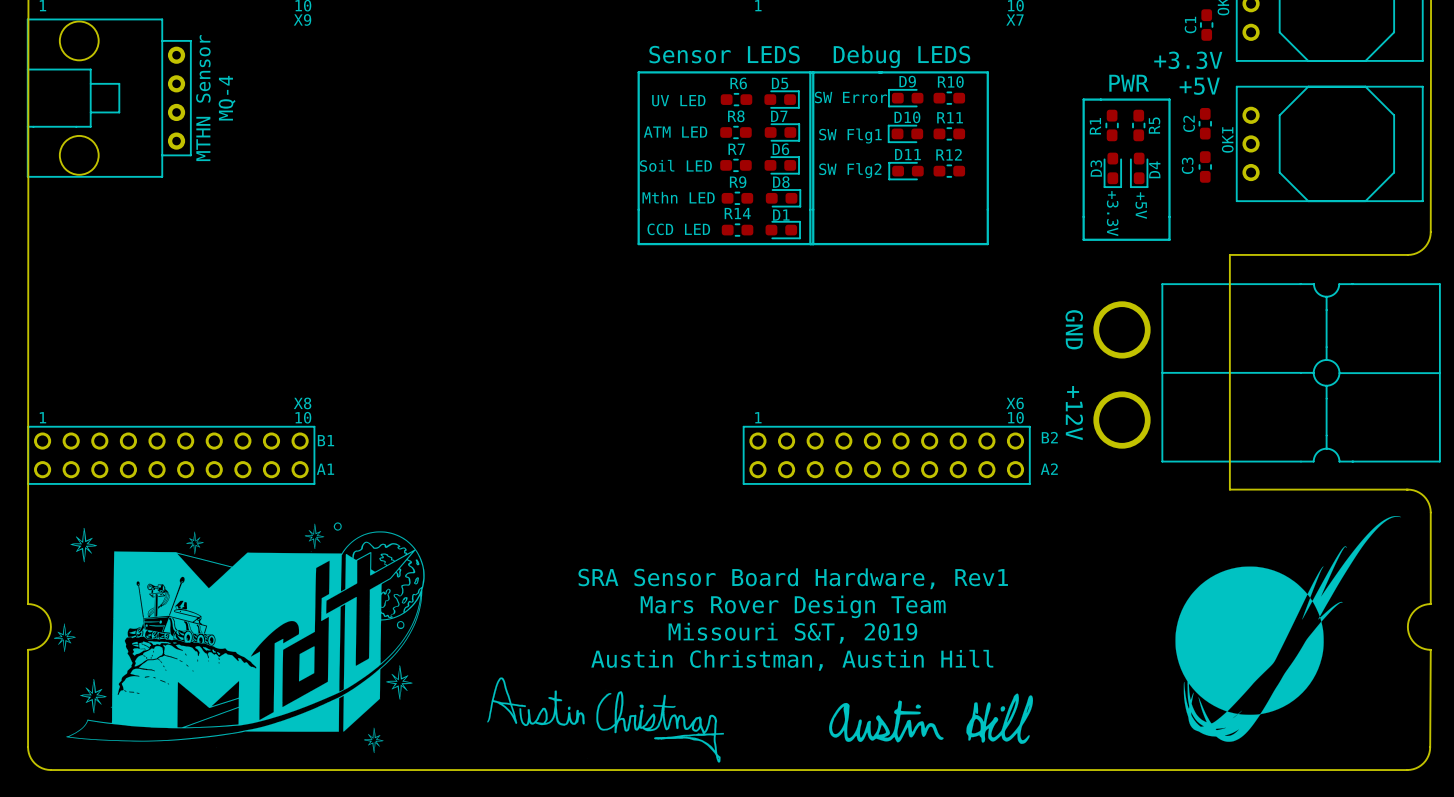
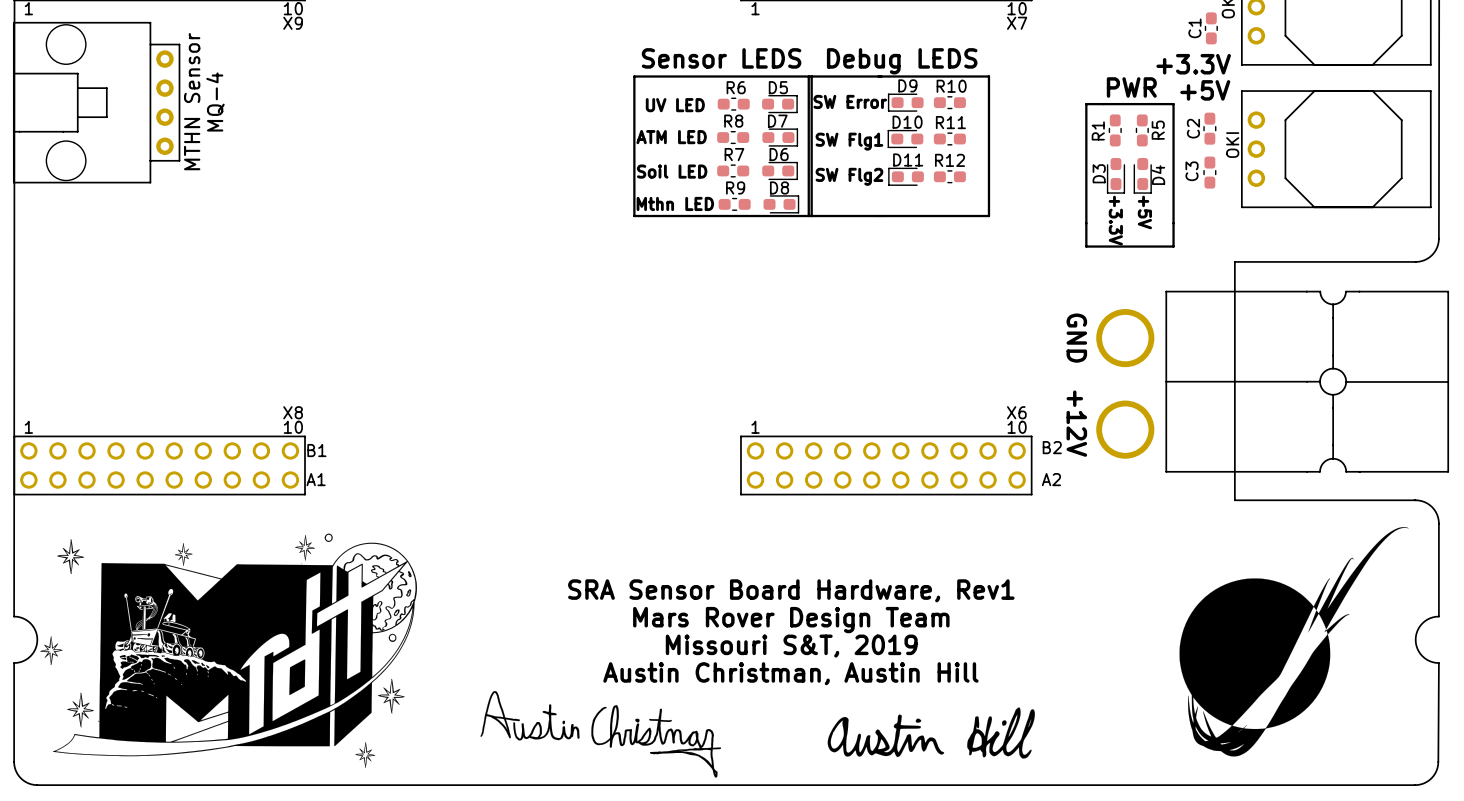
line: (638, 209) (638, 244) (987, 244) (987, 209) -> (634, 216) (988, 216)
line: (810, 209) (810, 244) -> none
line: (813, 209) (813, 244) -> none
text: CCD LED (678, 229) -> none
R14: (737, 230) -> none
D1: (783, 230) -> none

